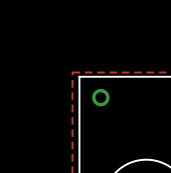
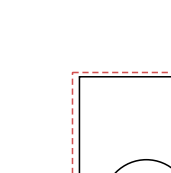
via: (100, 97) -> none

